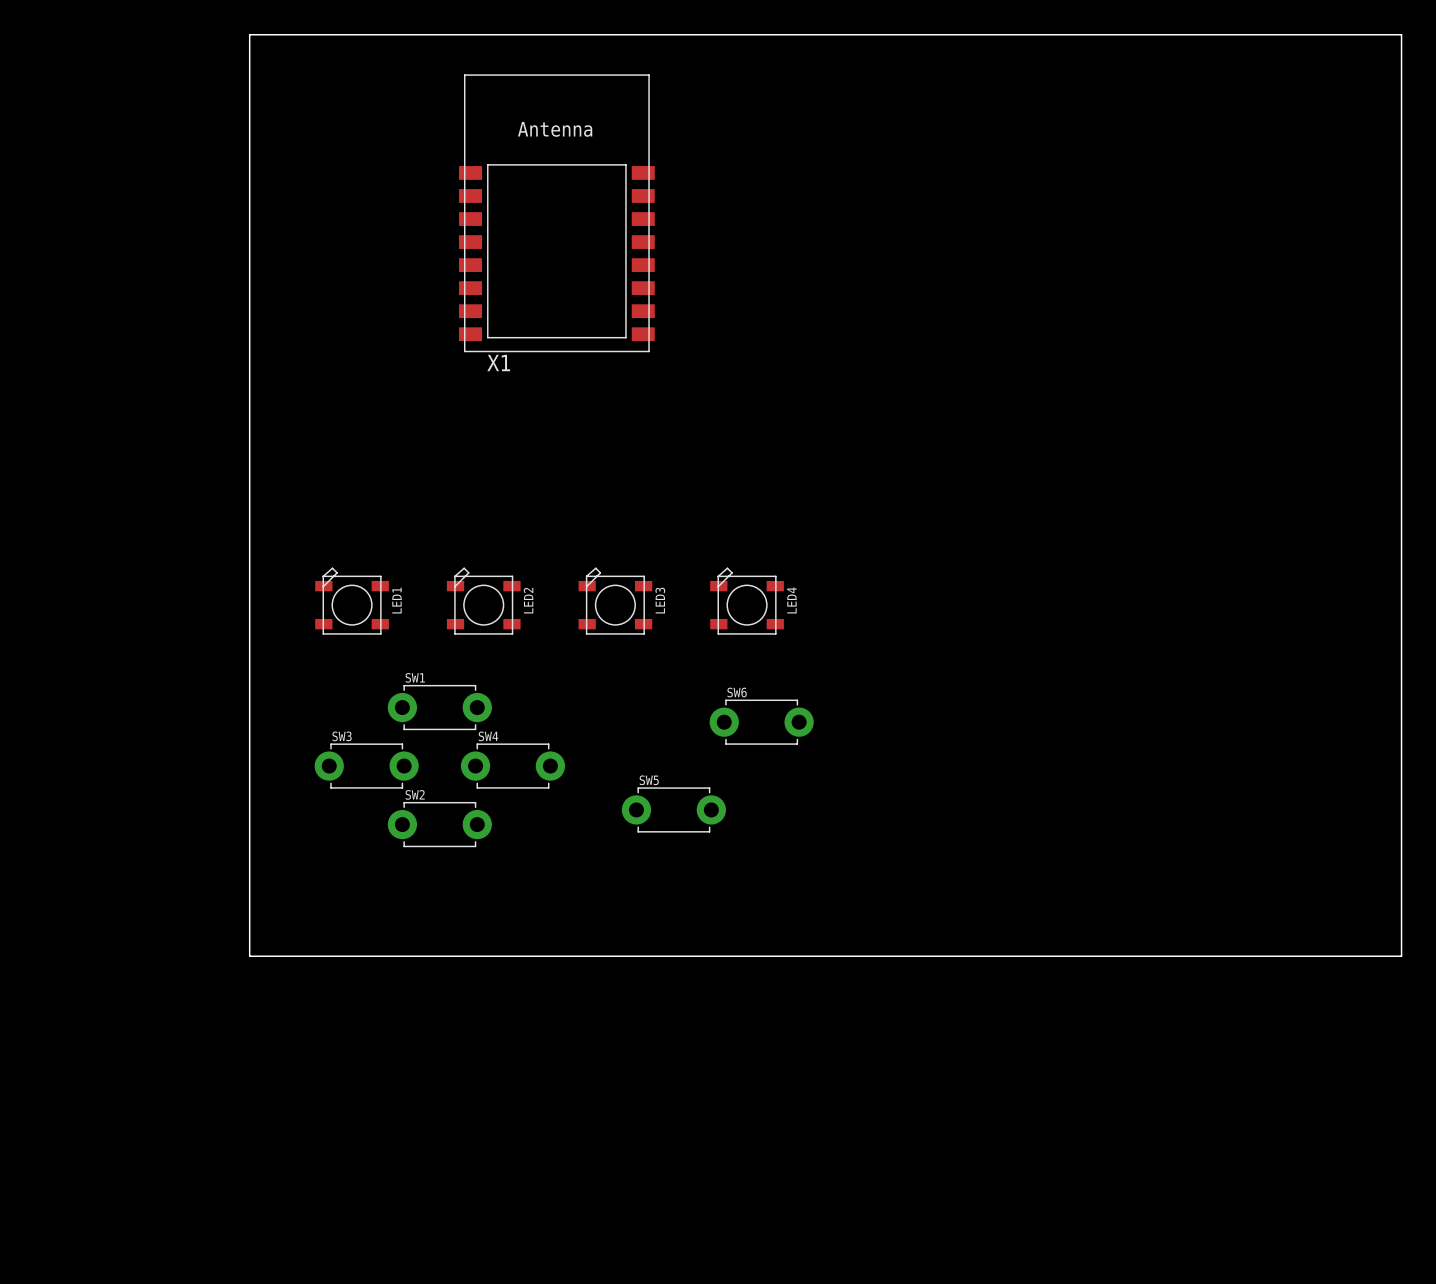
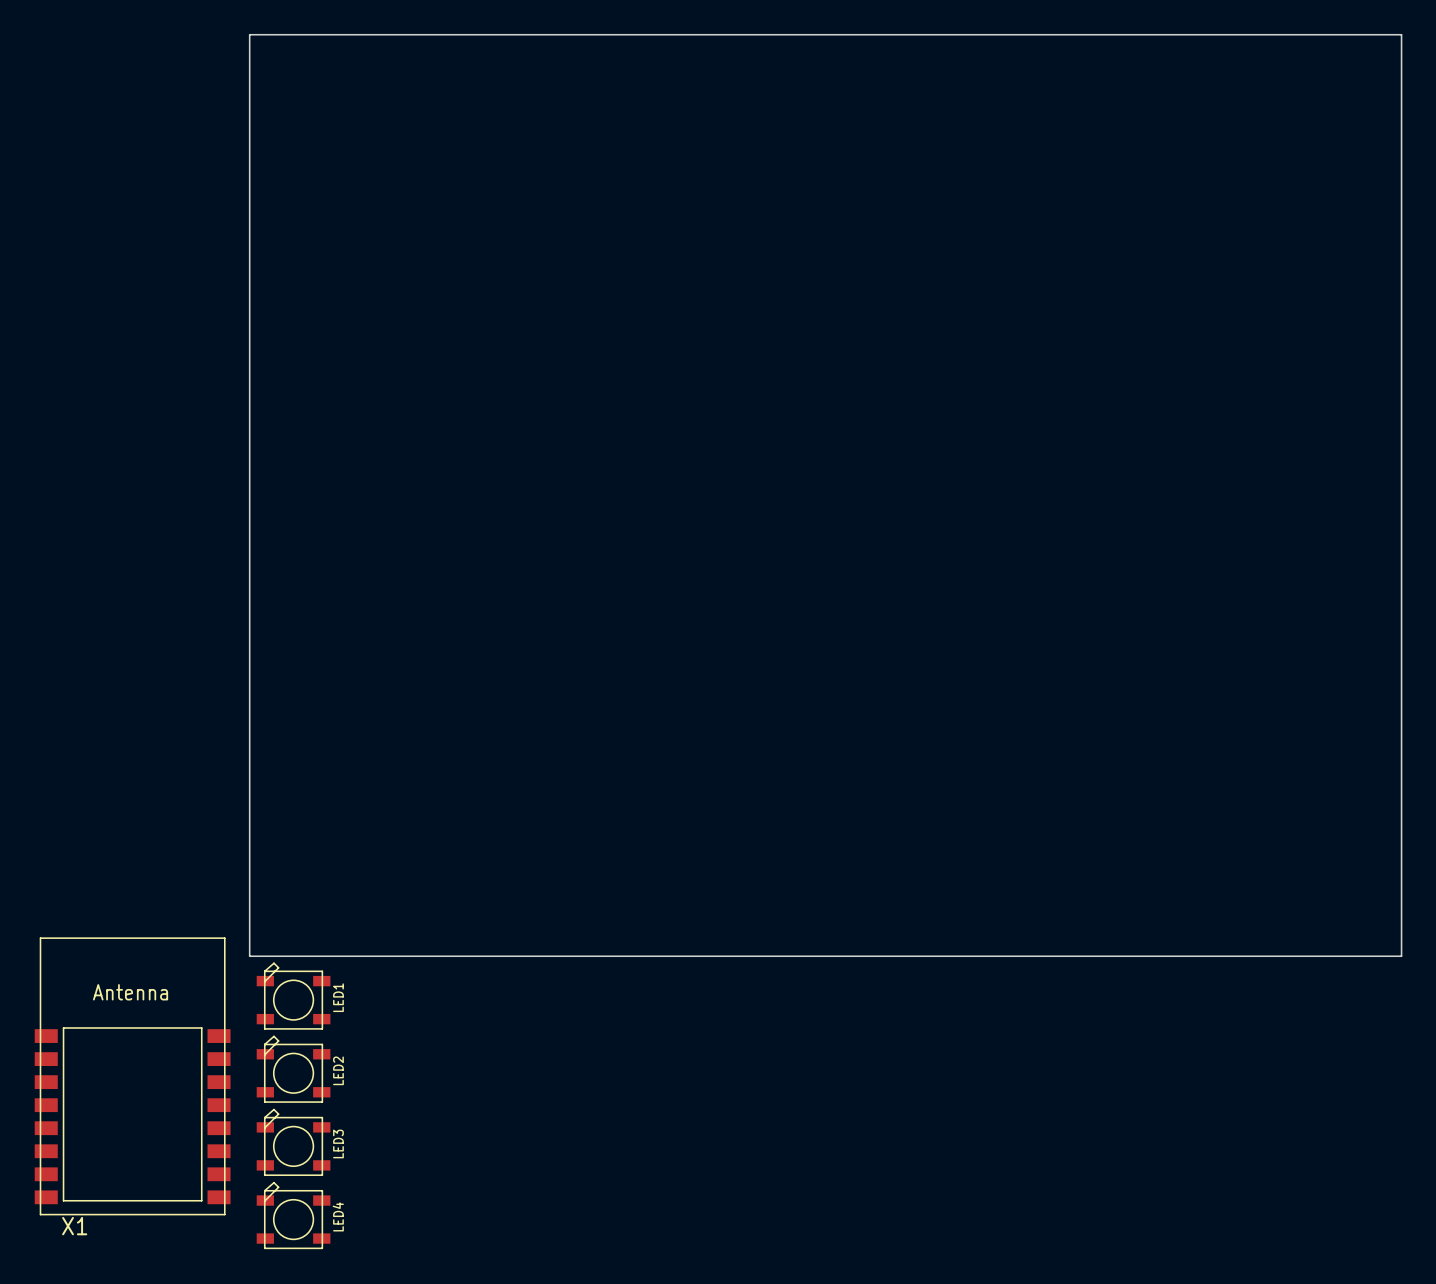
X1 position: (556, 213) -> (132, 1076)
LED1 position: (352, 601) -> (293, 996)
LED2 position: (483, 601) -> (293, 1069)
LED3 position: (615, 601) -> (293, 1142)
LED4 position: (747, 601) -> (293, 1215)
SW1: (439, 707) -> none
SW6: (761, 722) -> none
SW3: (366, 766) -> none
SW4: (512, 766) -> none
SW5: (673, 809) -> none
SW2: (439, 824) -> none

